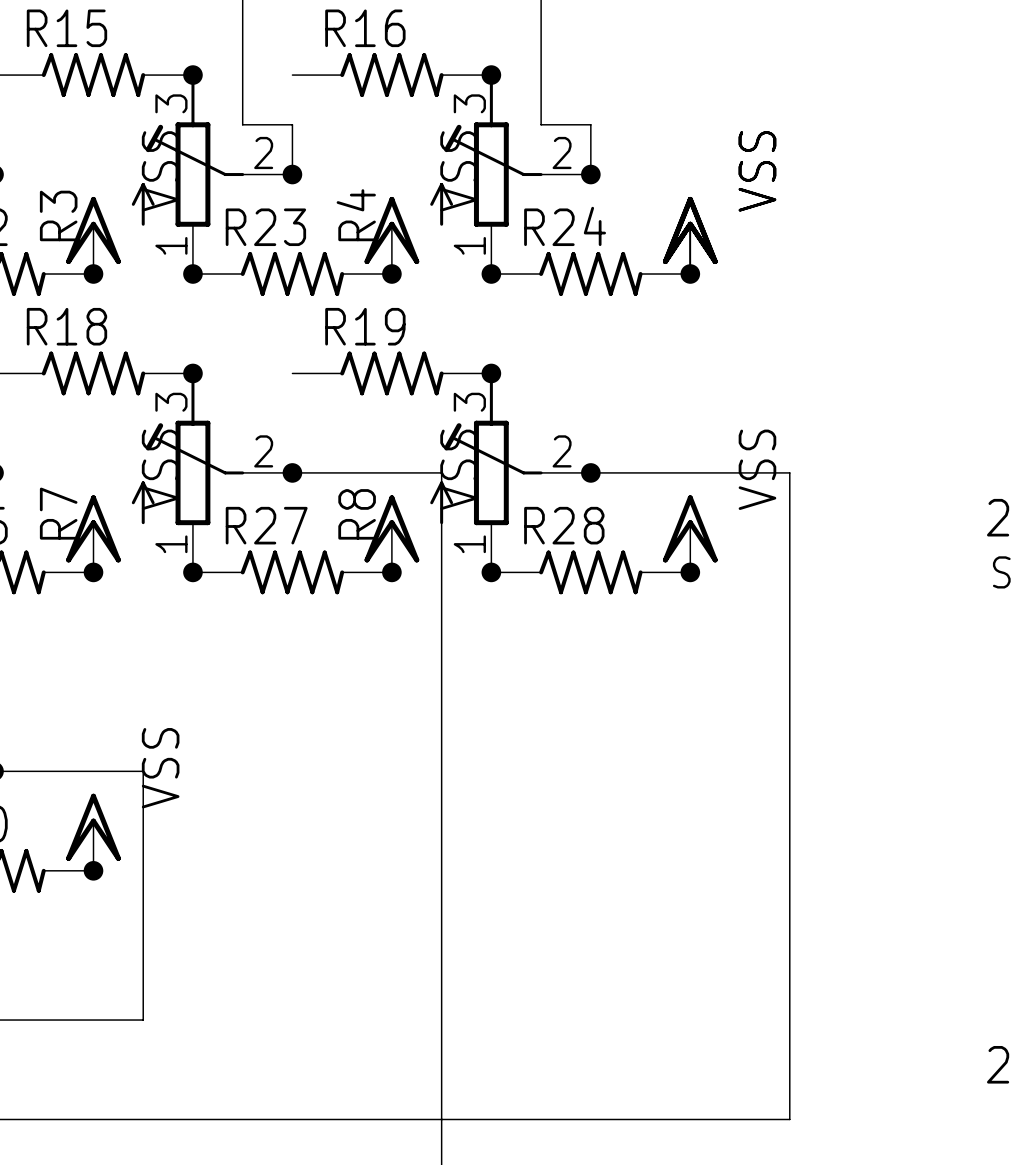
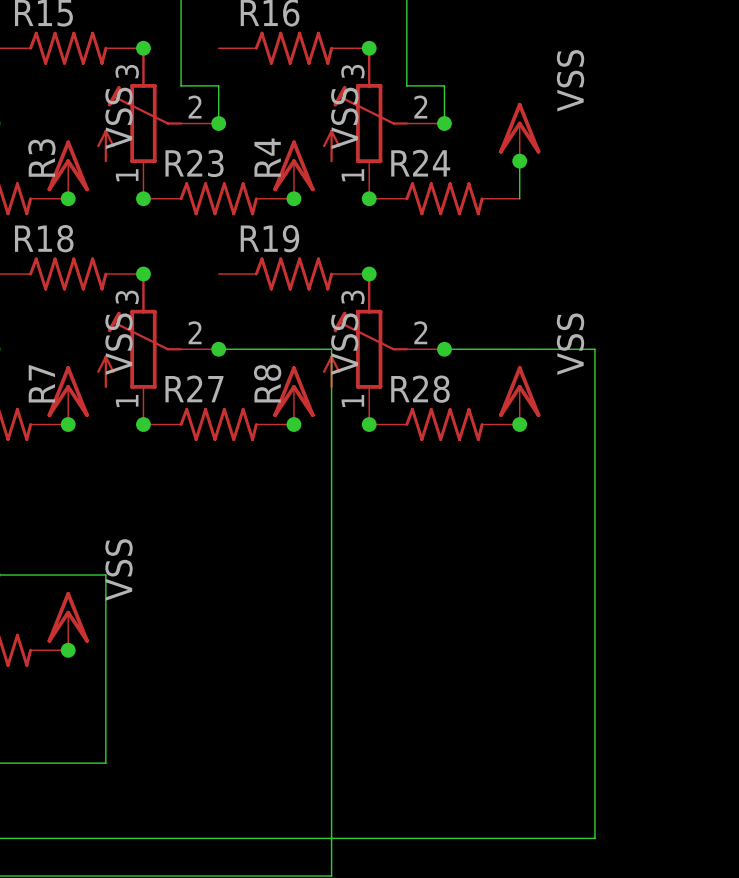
power symbol position: VSS (690, 235) -> VSS (519, 131)
junction position: (690, 274) -> (519, 161)

